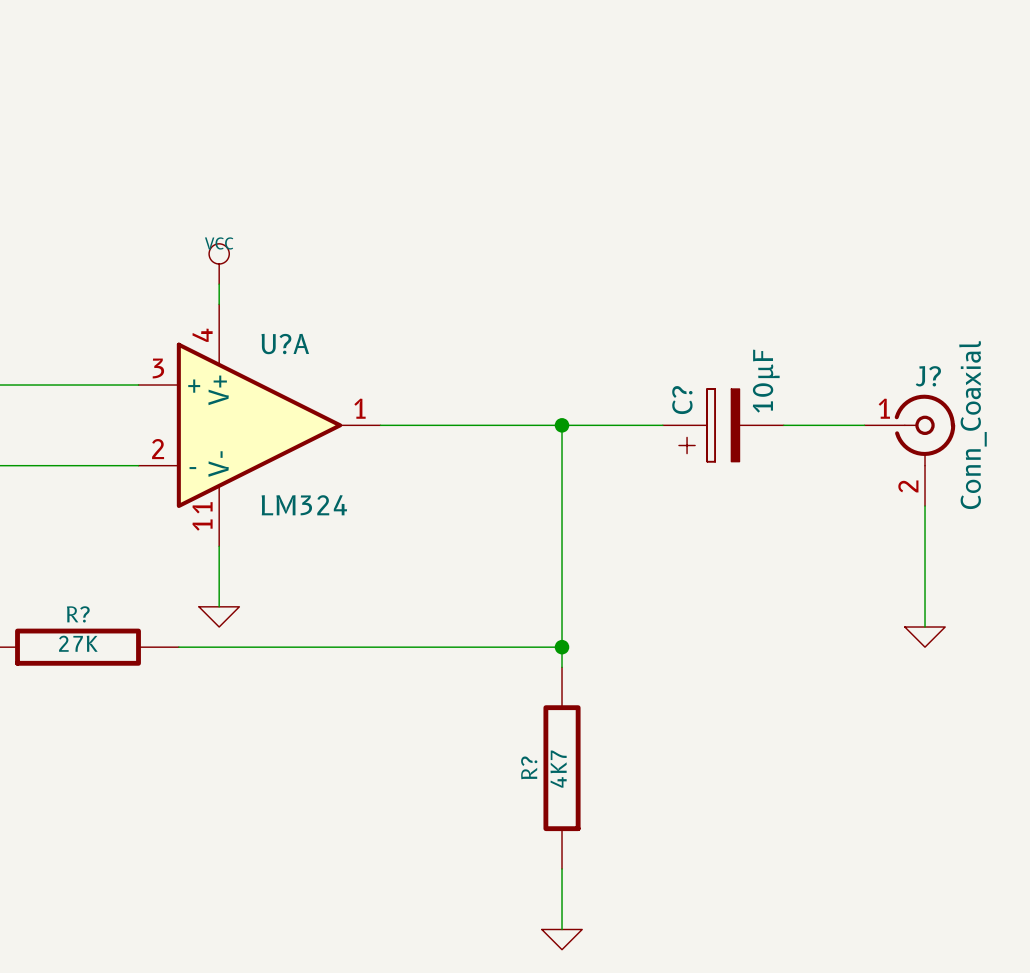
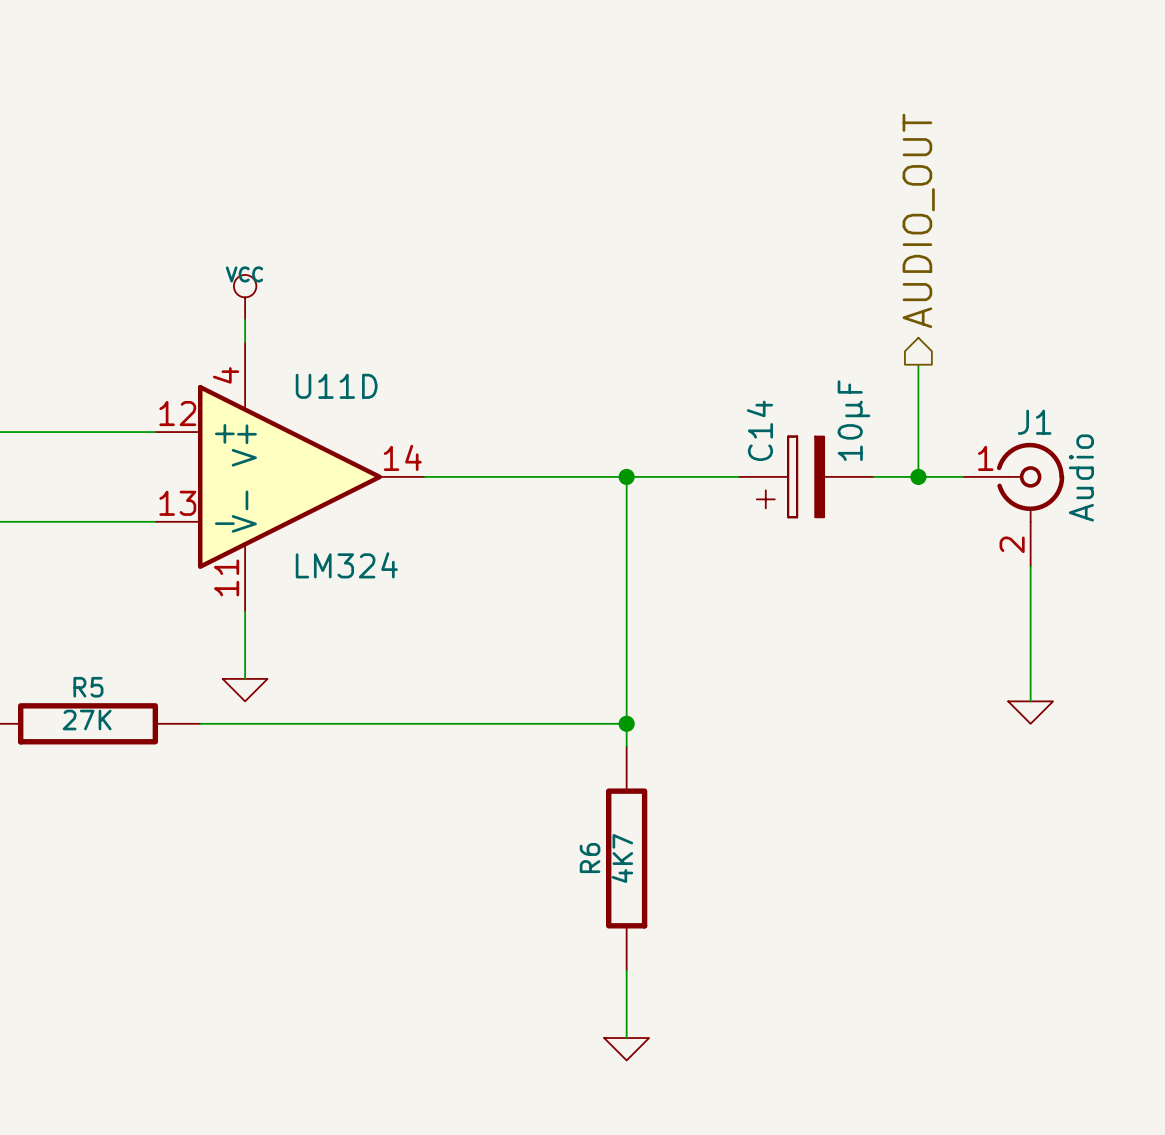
hierarchical label: none -> AUDIO_OUT (918, 220)
wire: none -> (918, 364) (918, 476)
U?A name: U?A (285, 344) -> U11D (336, 386)
U?A pin number: 3 (158, 368) -> 12 (177, 413)
J? name: J? (928, 376) -> J1 (1034, 422)
C? name: C? (682, 400) -> C14 (759, 430)
U?A pin number: 1 (359, 408) -> 14 (402, 457)
J? value: Conn_Coaxial (972, 424) -> Audio (1081, 478)
junction: none -> (918, 476)
U?A pin number: 2 (158, 449) -> 13 (177, 503)
R? name: R? (78, 614) -> R5 (88, 687)
R? name: R? (529, 767) -> R6 (590, 858)

